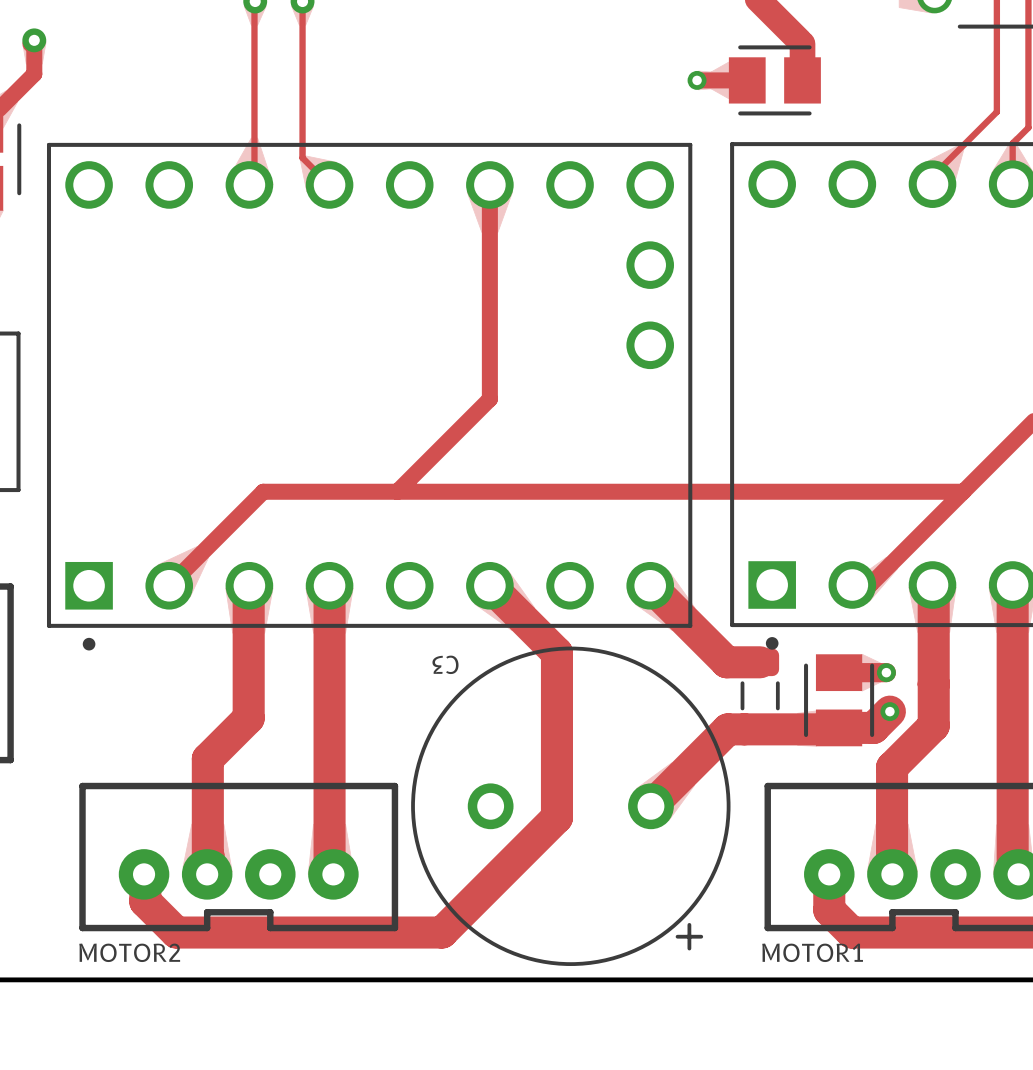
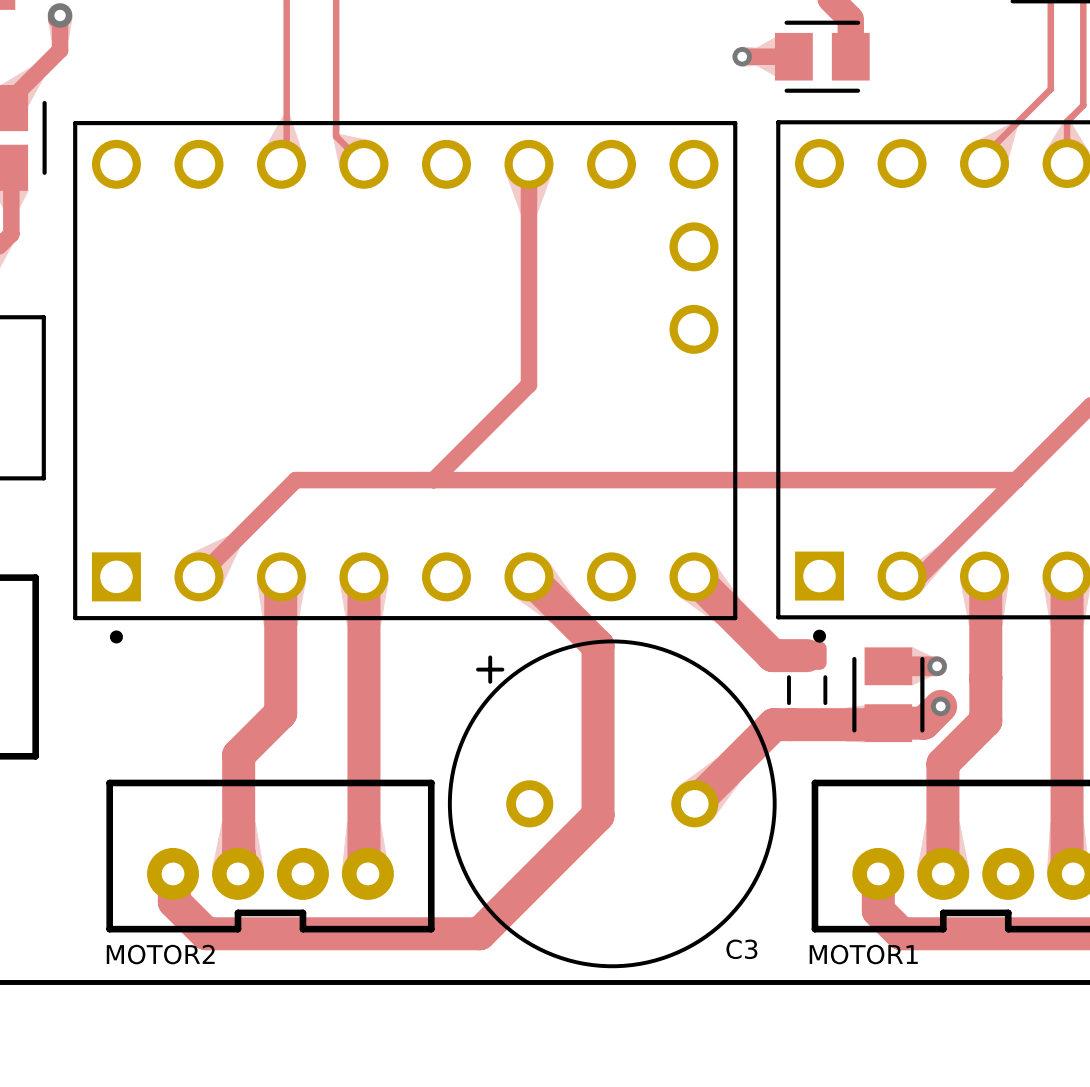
C3 rotation: 0° (570, 806) -> 180° (612, 803)

